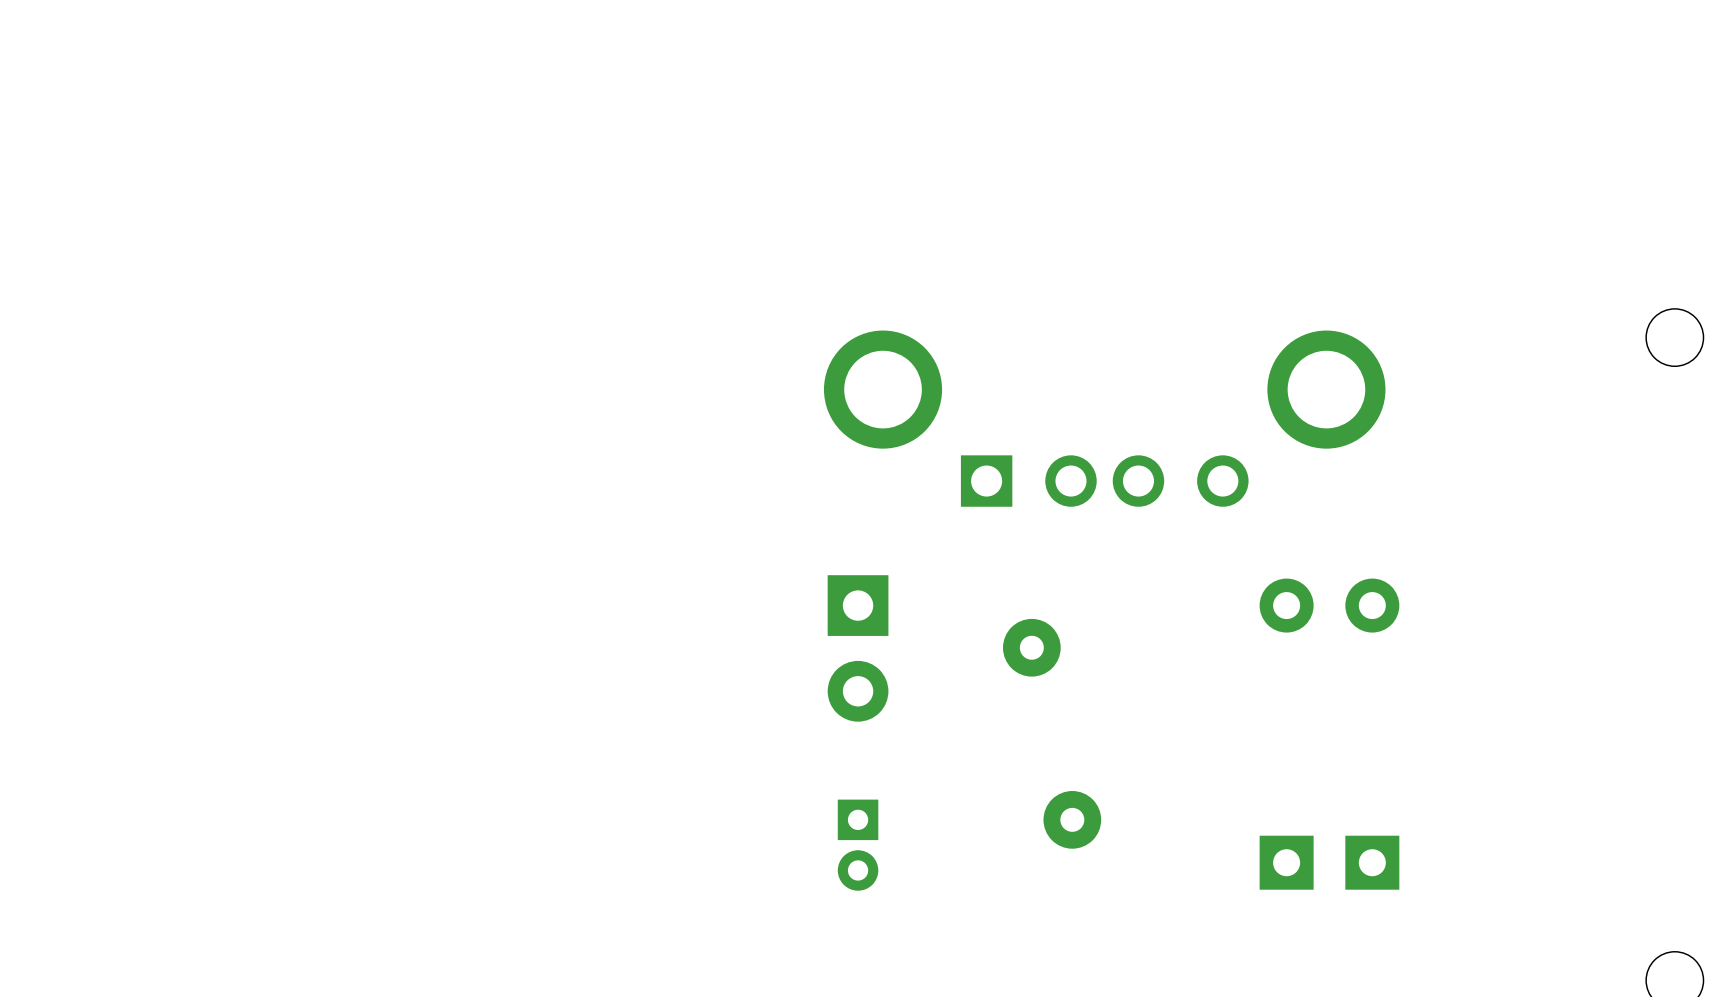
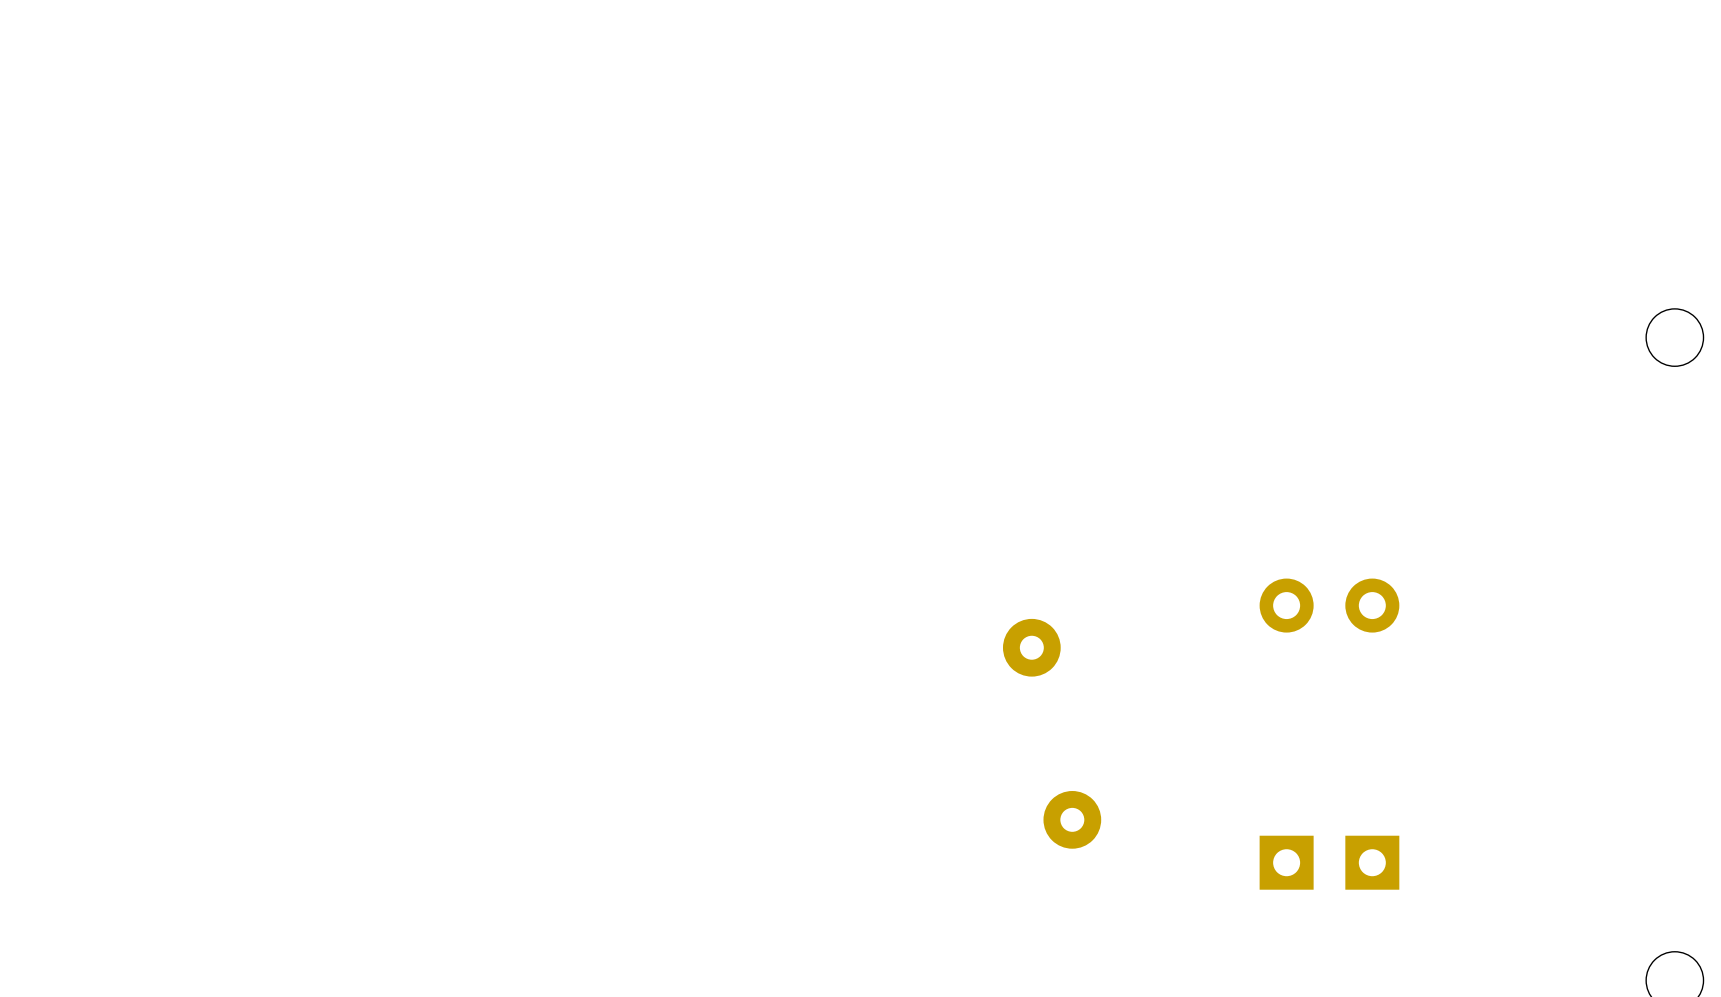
part: (1104, 418) -> none
part: (858, 648) -> none
part: (858, 845) -> none

